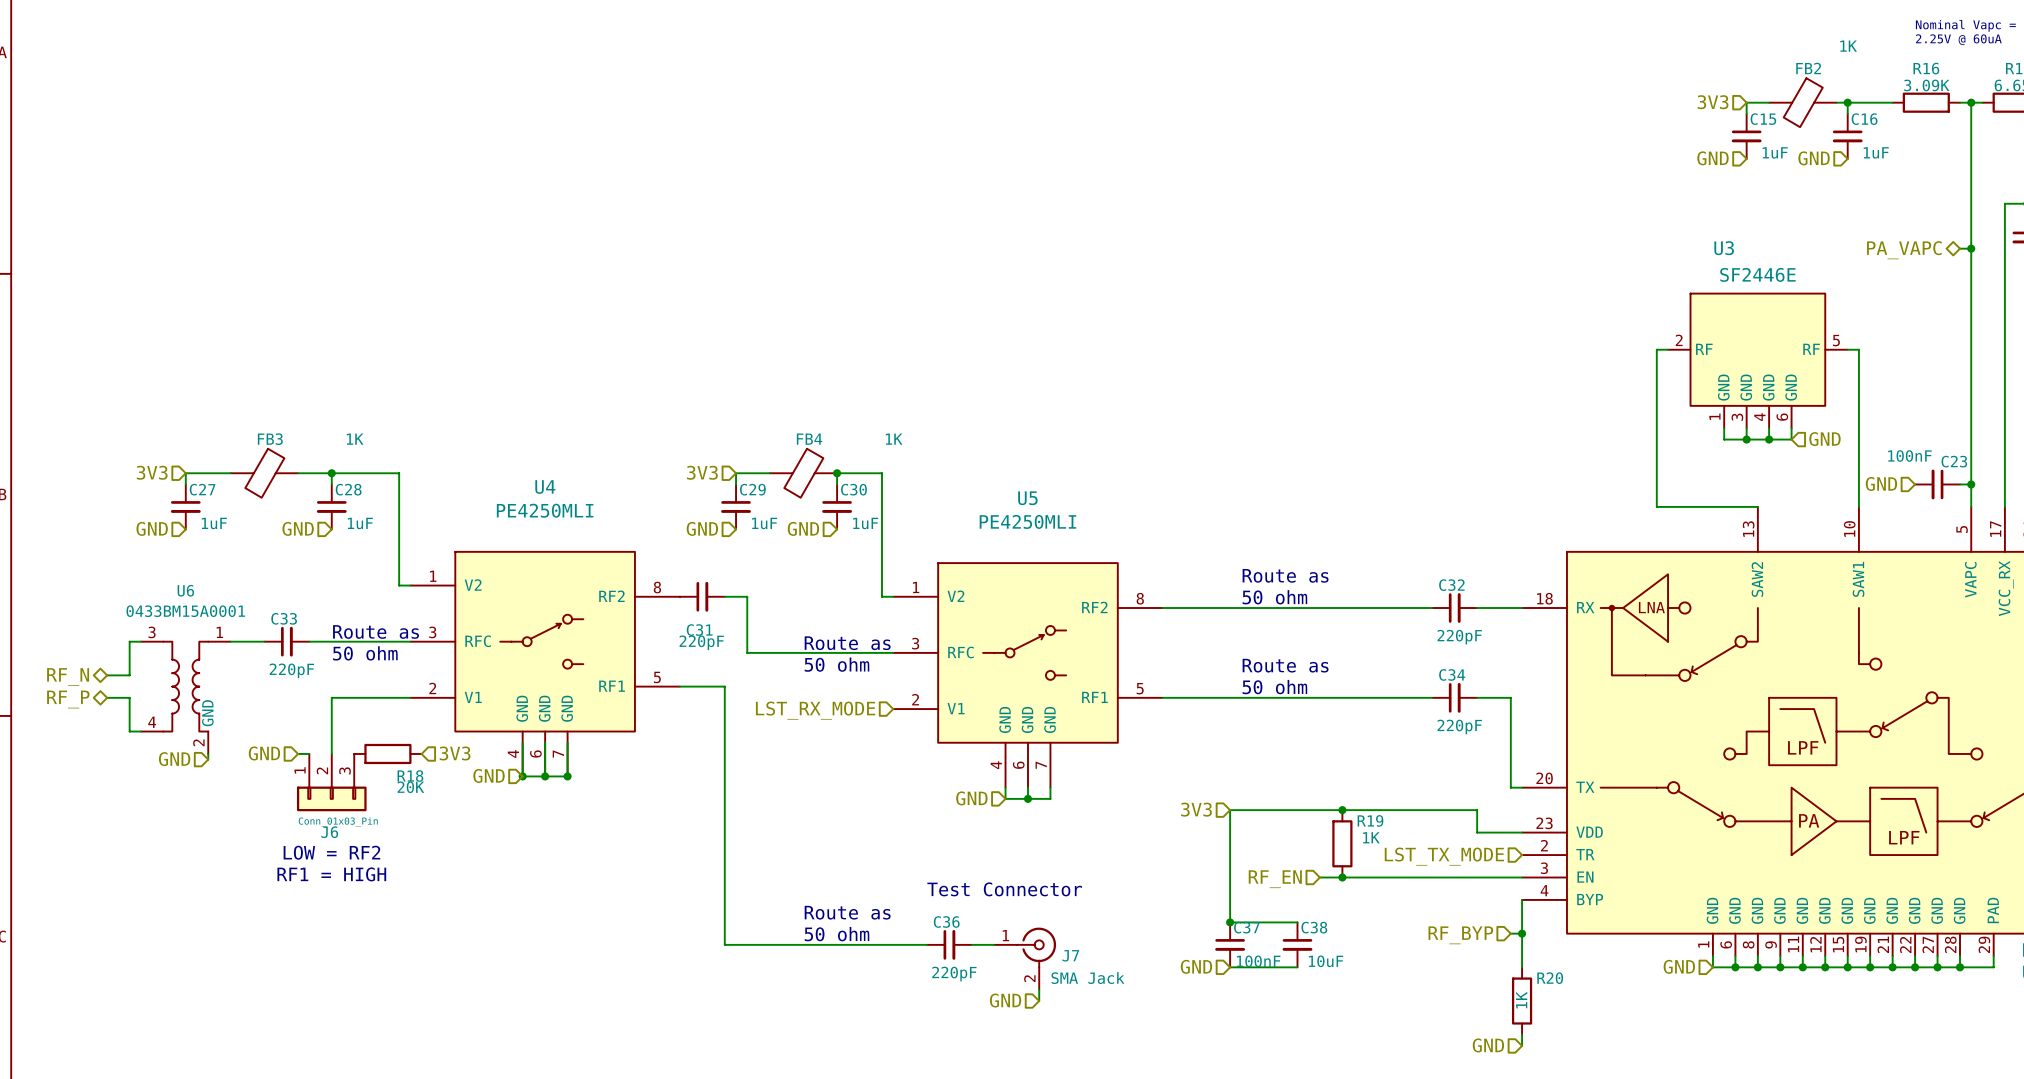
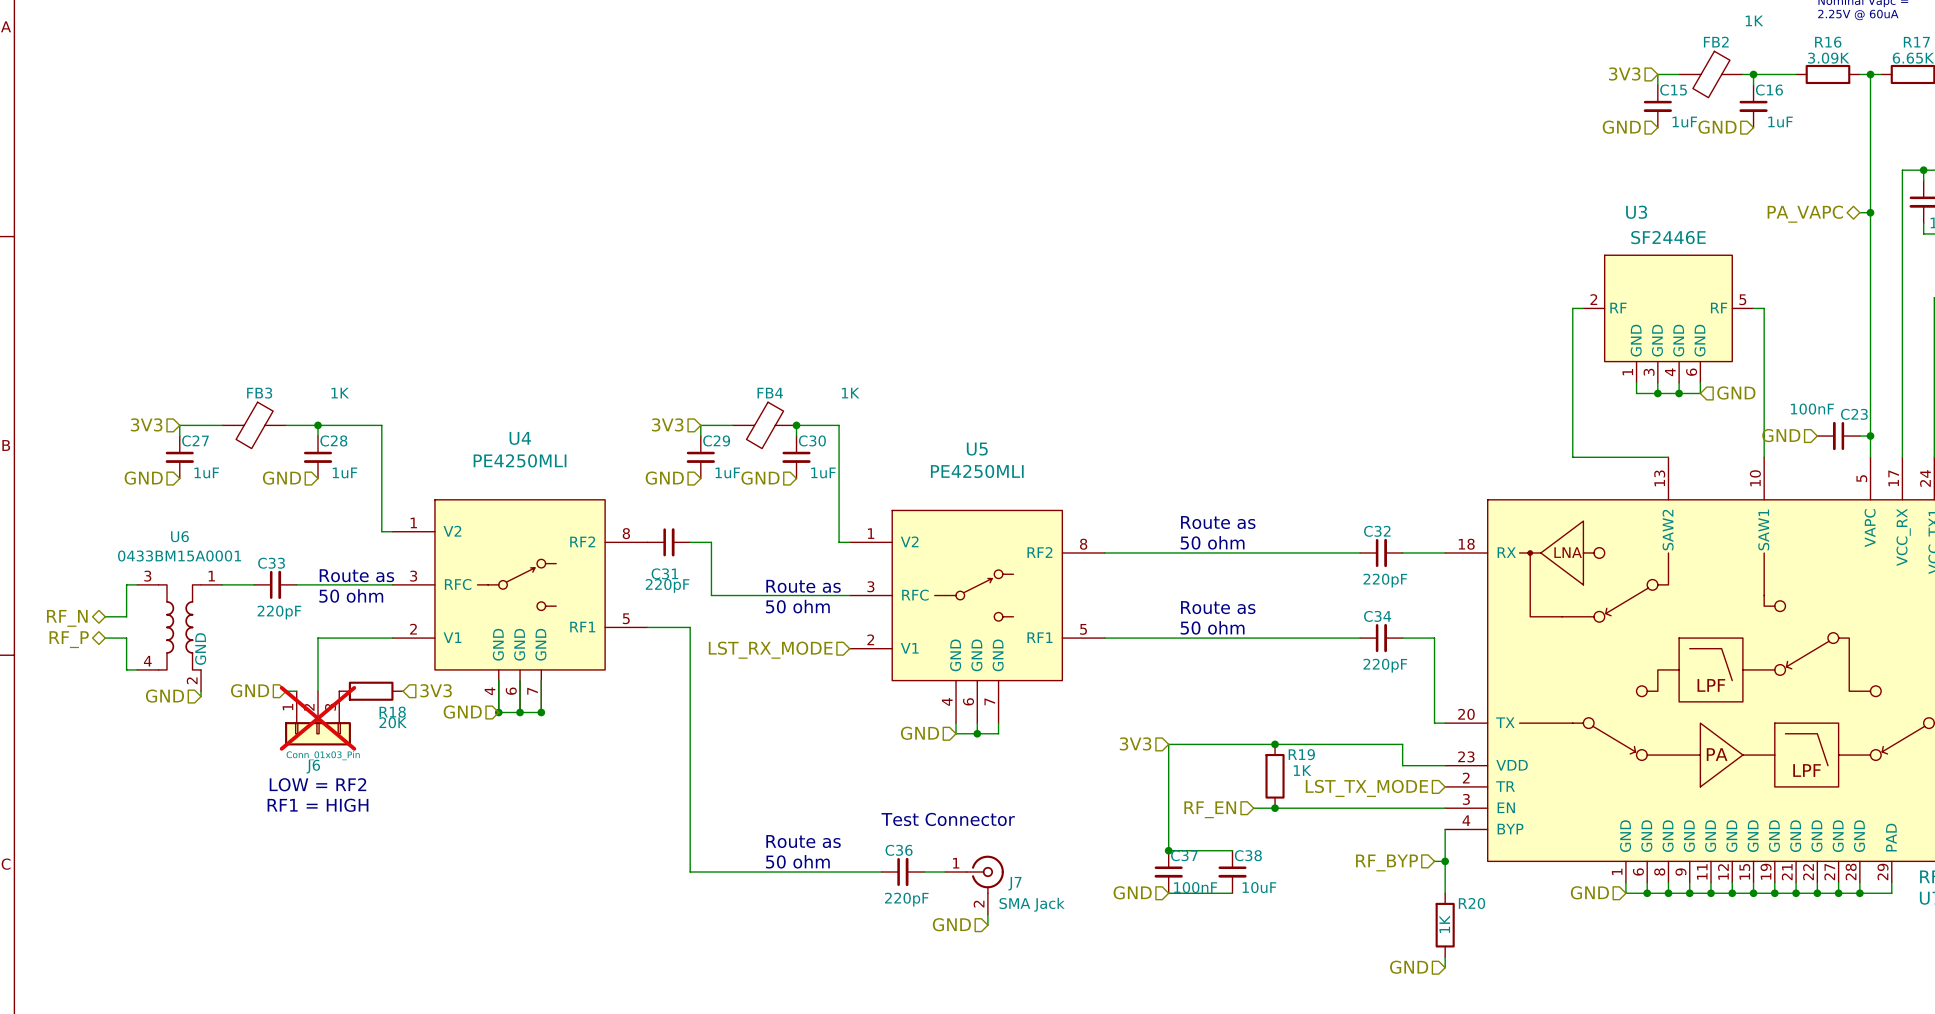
J6 do-not-place cross: none -> (318, 718)

